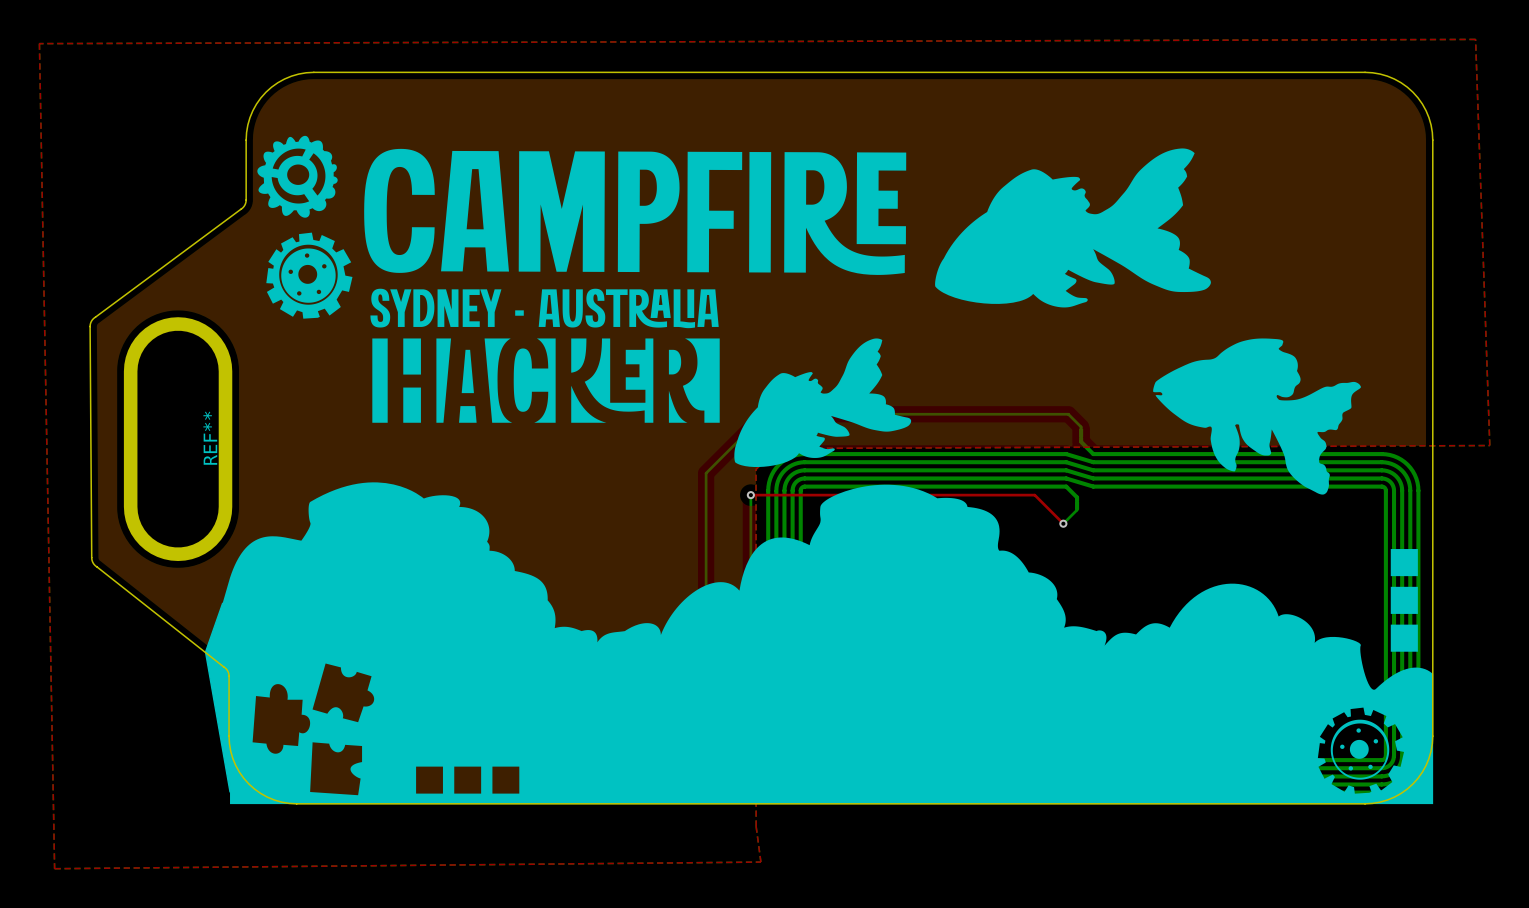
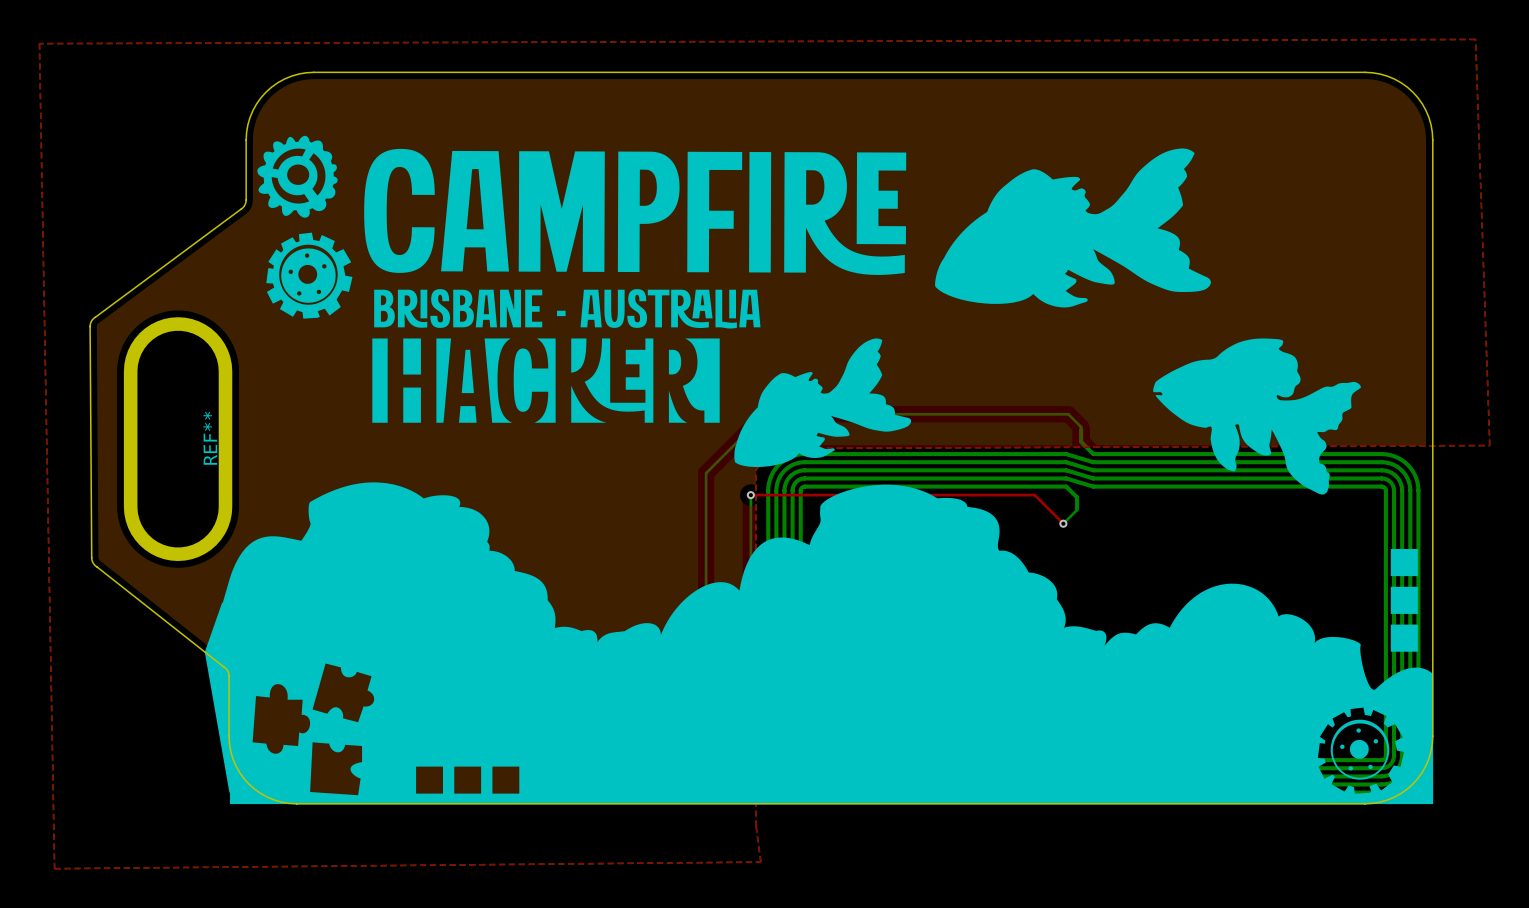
drawing: none -> [374, 289, 428, 328]
drawing: [390, 289, 412, 327] -> none
drawing shape: [413, 289, 435, 327] -> [420, 289, 428, 319]
drawing: none -> [453, 289, 474, 328]
drawing shape: [480, 289, 502, 327] -> [475, 289, 498, 328]
drawing: [538, 289, 560, 327] -> none
drawing: none -> [580, 289, 602, 328]
drawing position: (660, 303) -> (702, 304)
drawing position: (690, 303) -> (732, 304)
drawing position: (380, 308) -> (440, 308)
drawing position: (448, 308) -> (510, 308)
drawing position: (471, 308) -> (533, 308)
drawing position: (572, 308) -> (614, 308)
drawing position: (595, 308) -> (637, 308)
drawing position: (616, 308) -> (658, 308)
drawing position: (648, 308) -> (690, 308)
drawing position: (684, 308) -> (726, 309)
drawing position: (708, 308) -> (749, 308)
drawing position: (519, 313) -> (561, 313)

